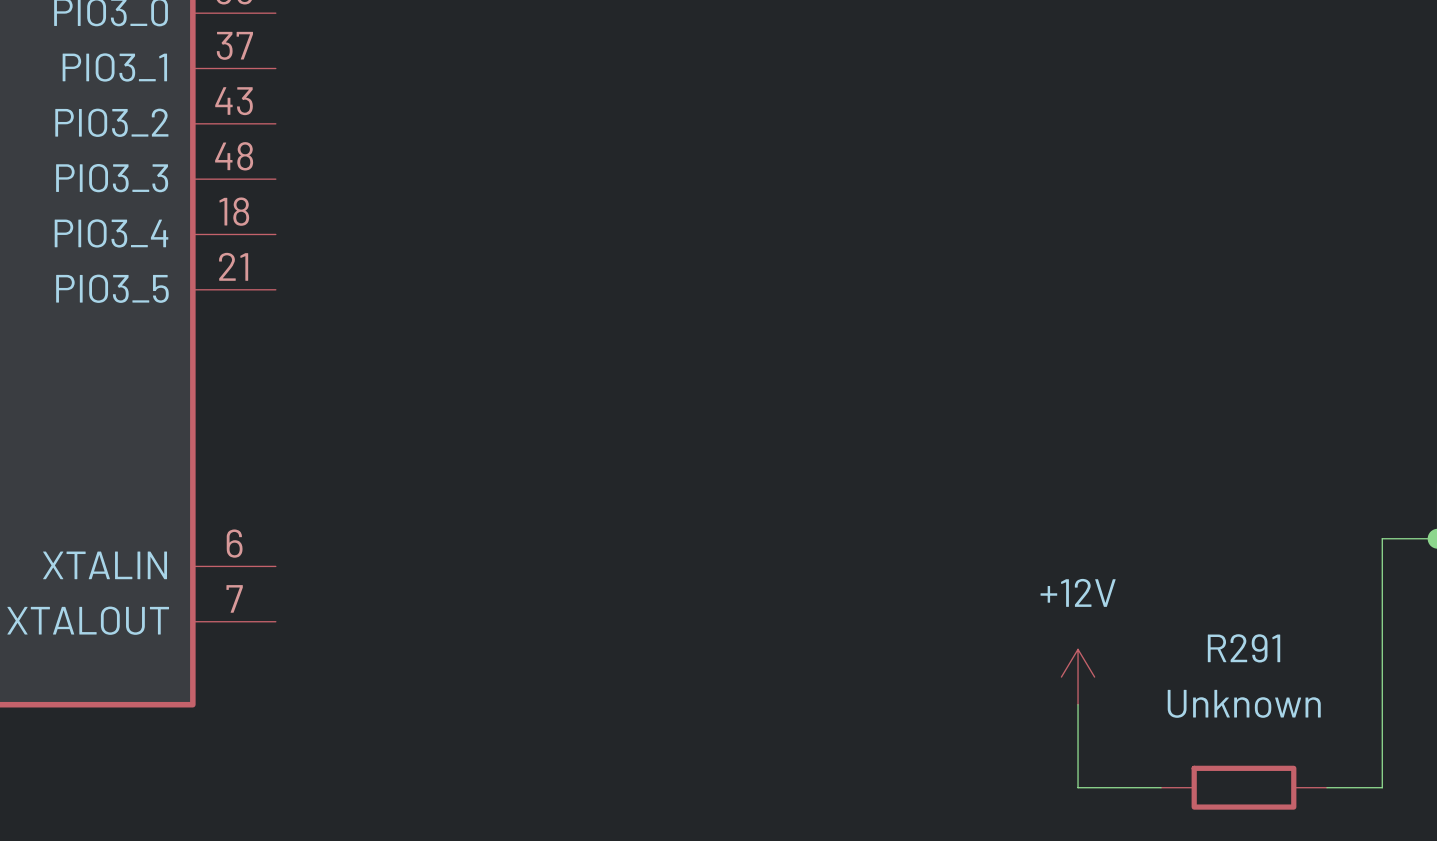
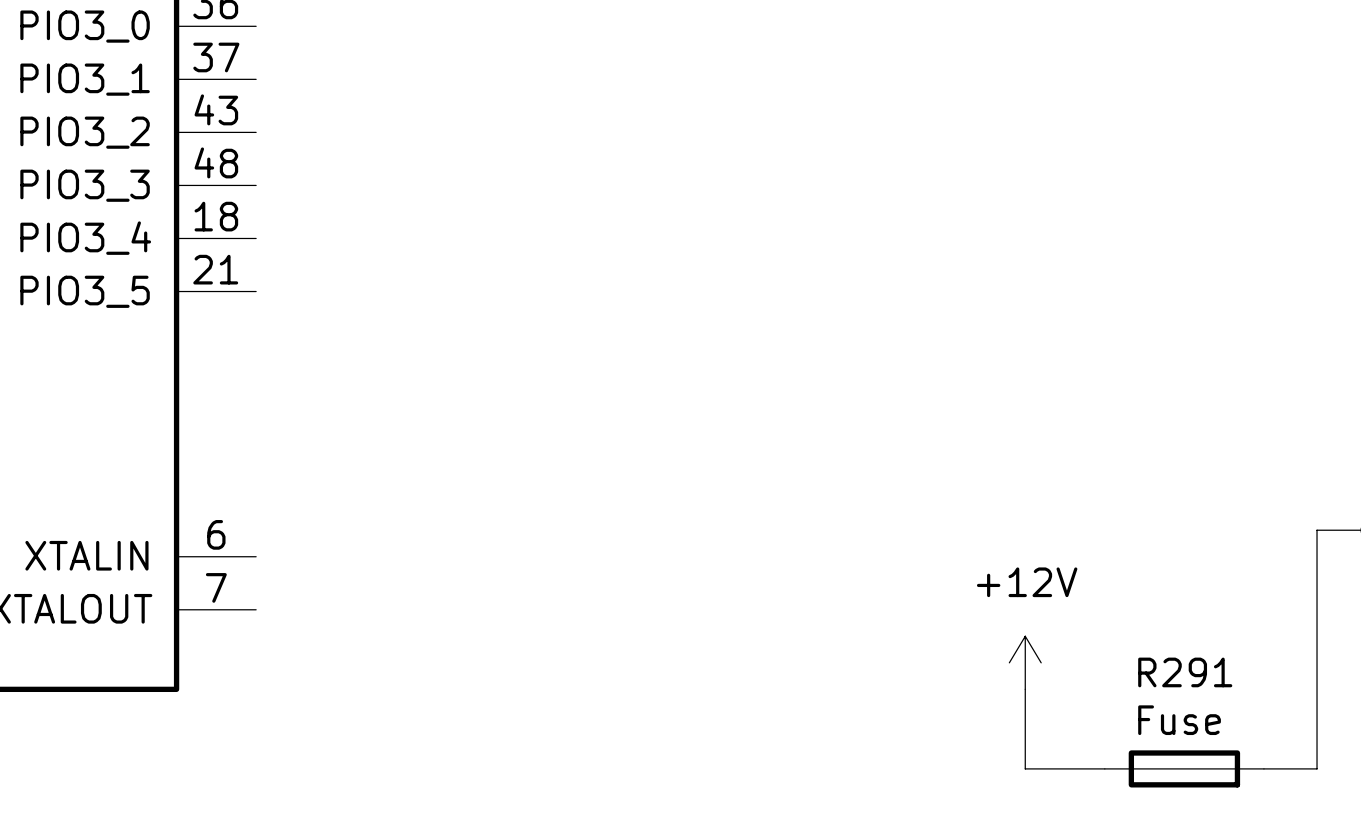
R291 name position: R291 (1244, 648) -> R291 (1185, 672)
R291 value: Unknown (1244, 703) -> Fuse (1179, 720)
R291 symbol: [1161, 765, 1327, 810] -> [1104, 750, 1264, 788]

